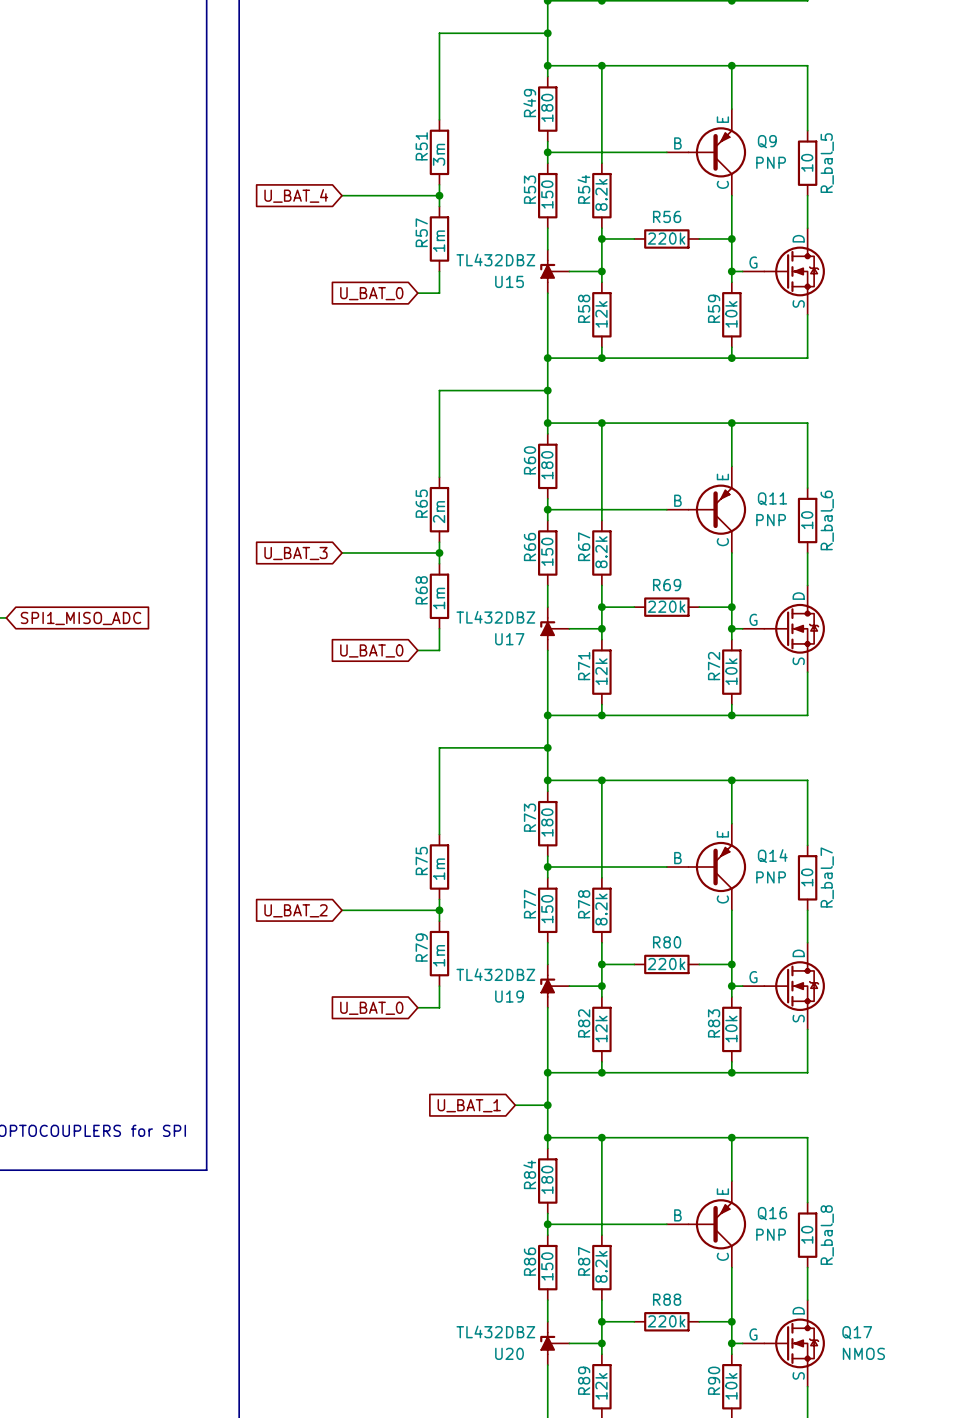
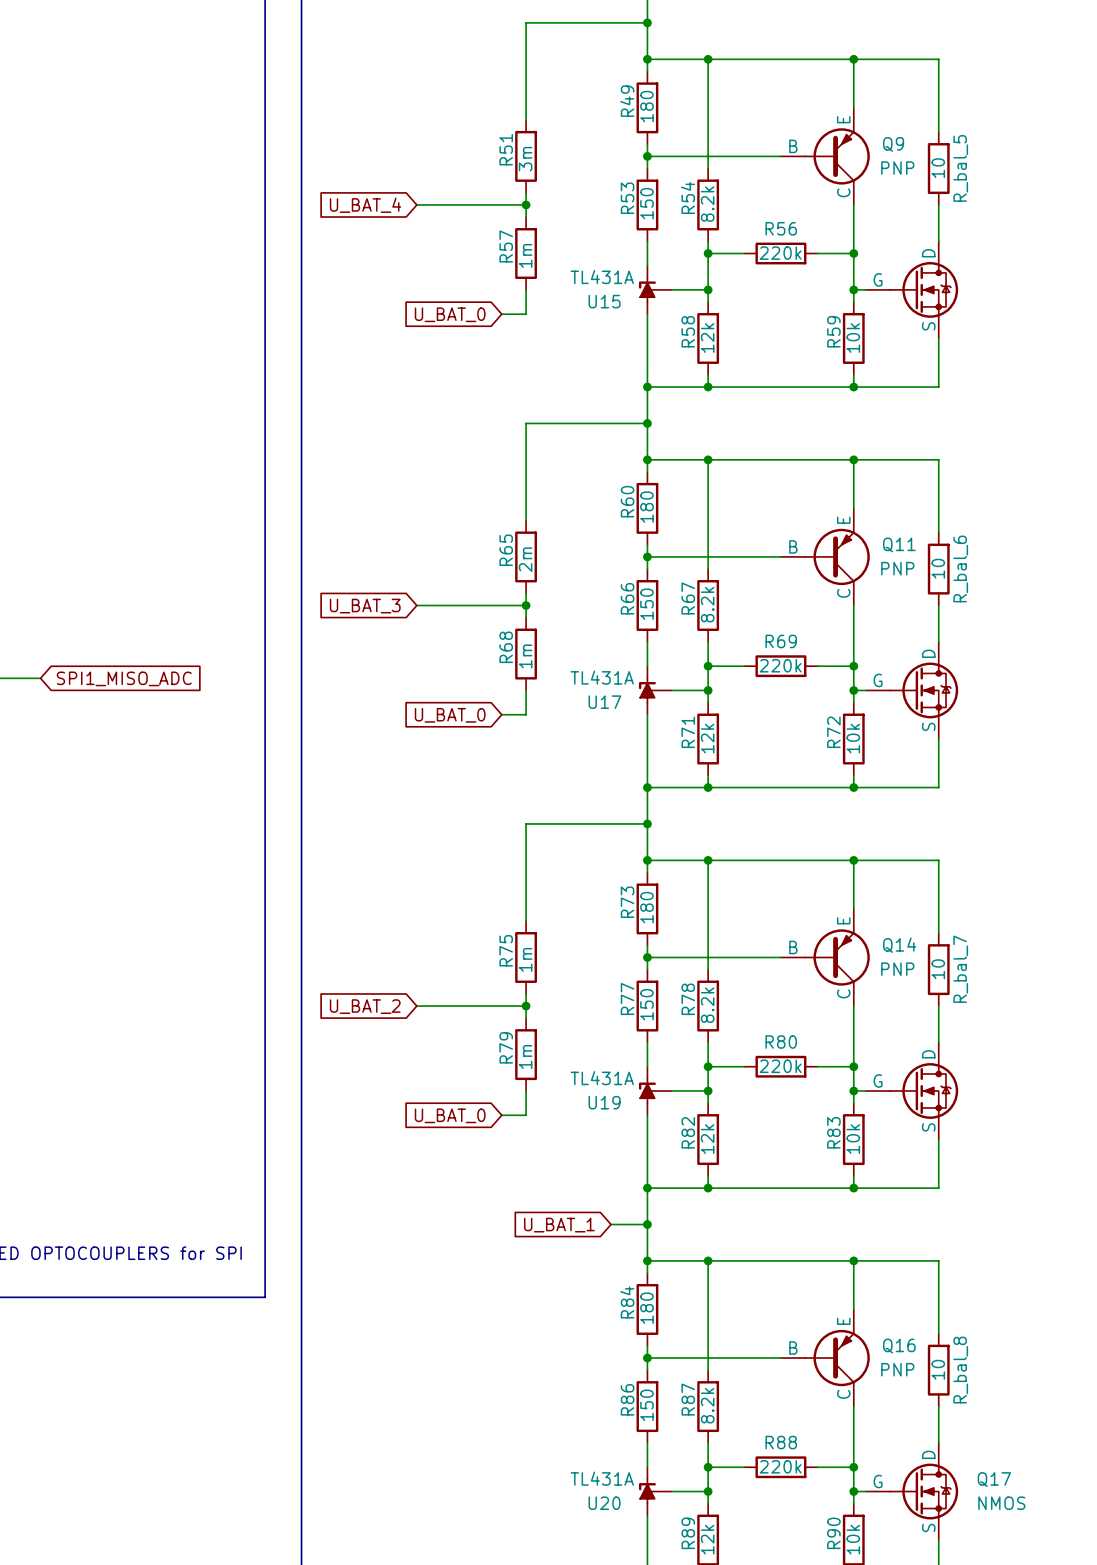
U15 value: TL432DBZ (495, 259) -> TL431A (602, 277)
U17 value: TL432DBZ (495, 617) -> TL431A (602, 677)
U19 value: TL432DBZ (495, 974) -> TL431A (602, 1078)
U20 value: TL432DBZ (495, 1331) -> TL431A (602, 1478)

